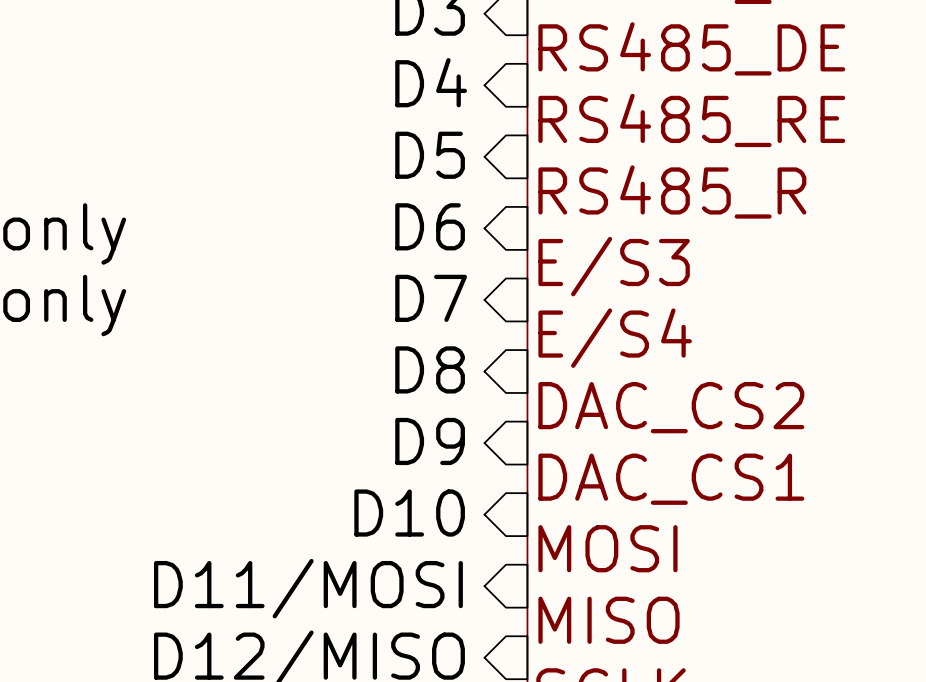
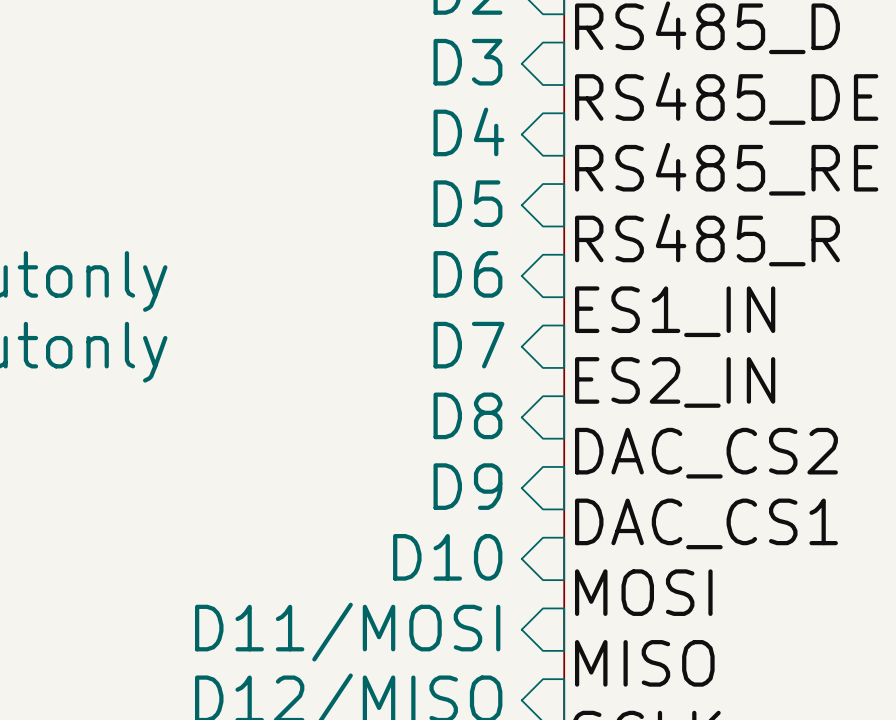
label: E/S3 (614, 266) -> ES1_IN (675, 311)
label: E/S4 (615, 338) -> ES2_IN (675, 382)

